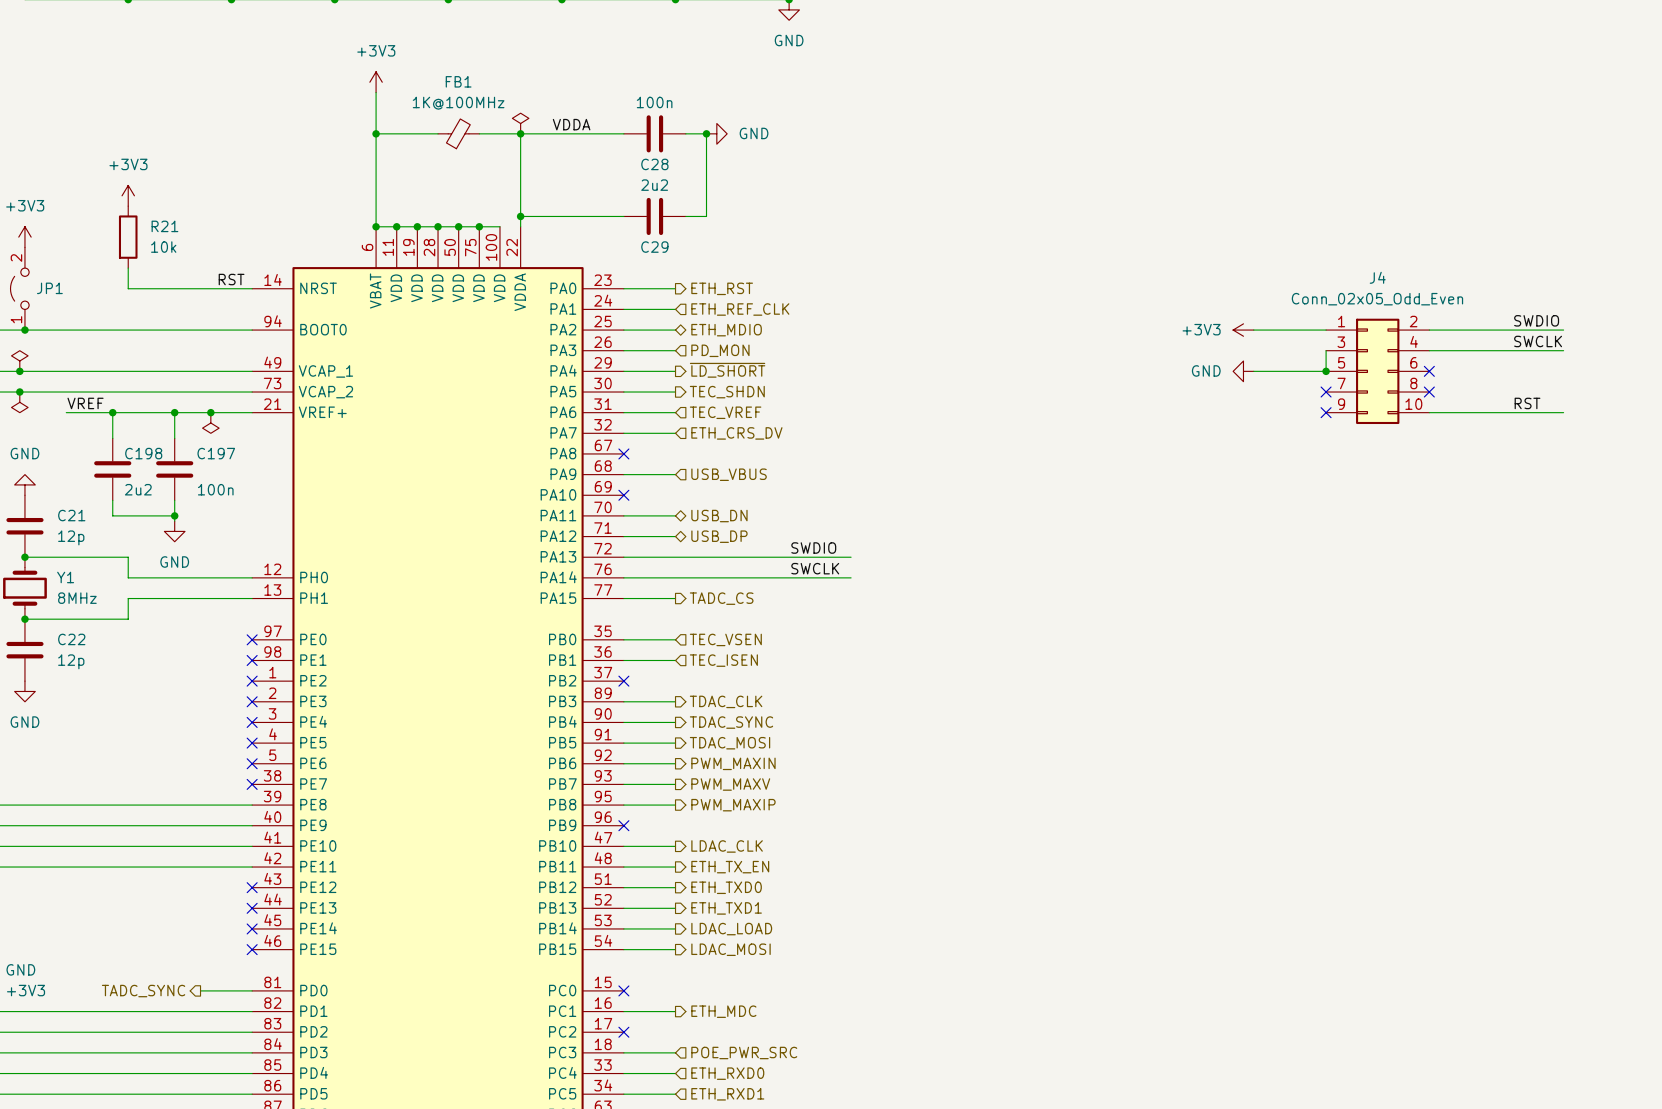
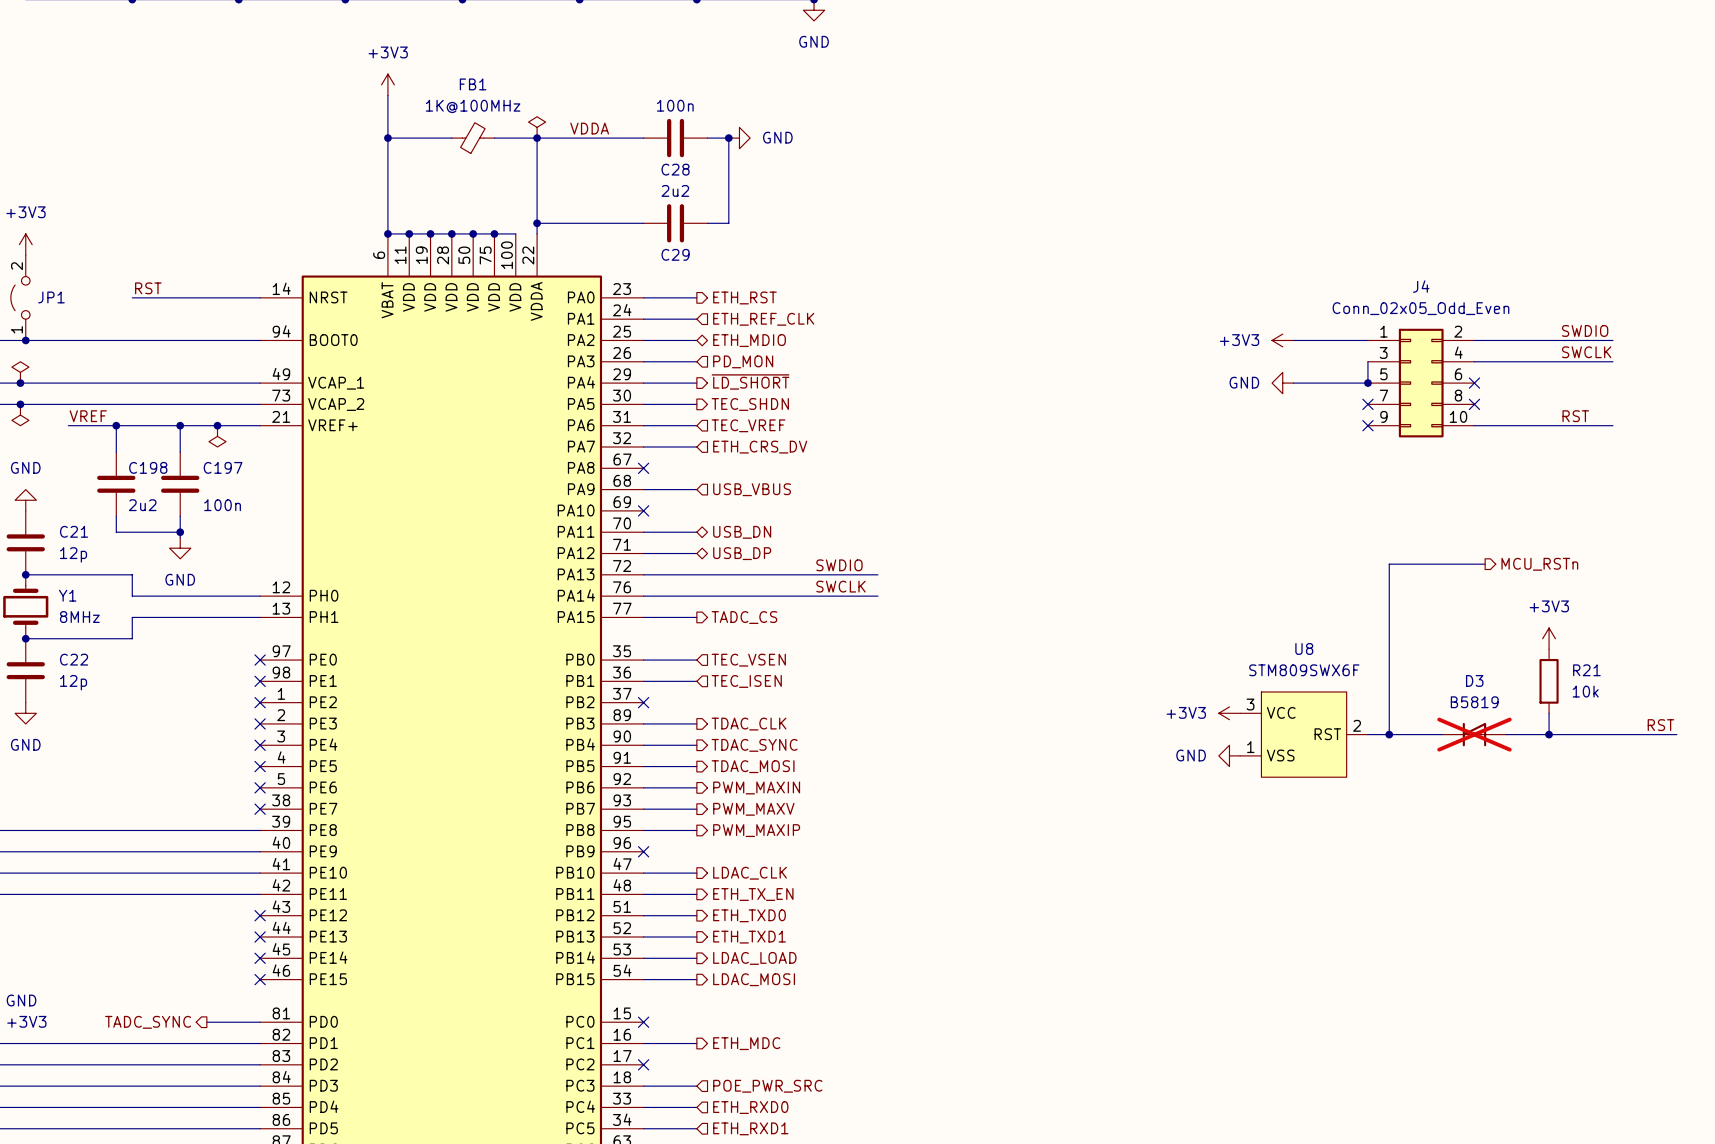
power symbol: +3V3 (128, 195) -> none
R21 position: (128, 237) -> (1549, 681)
wire: (128, 268) (128, 288) -> none
label position: RST (231, 279) -> RST (148, 288)
wire: none -> (1485, 564) (1389, 564) (1389, 734)
hierarchical label: none -> MCU_RSTn (1539, 564)
power symbol: none -> +3V3 (1549, 638)
power symbol: none -> +3V3 (1229, 713)
wire: none -> (1549, 713) (1549, 734)
label: none -> RST (1660, 725)
U8: none -> STM809SWX6F (1304, 734)
wire: none -> (1367, 734) (1442, 734)
junction: none -> (1389, 734)
D3: none -> B5819 (1474, 734)
wire: none -> (1506, 734) (1676, 734)
junction: none -> (1549, 734)
power symbol: none -> GND (1229, 755)

